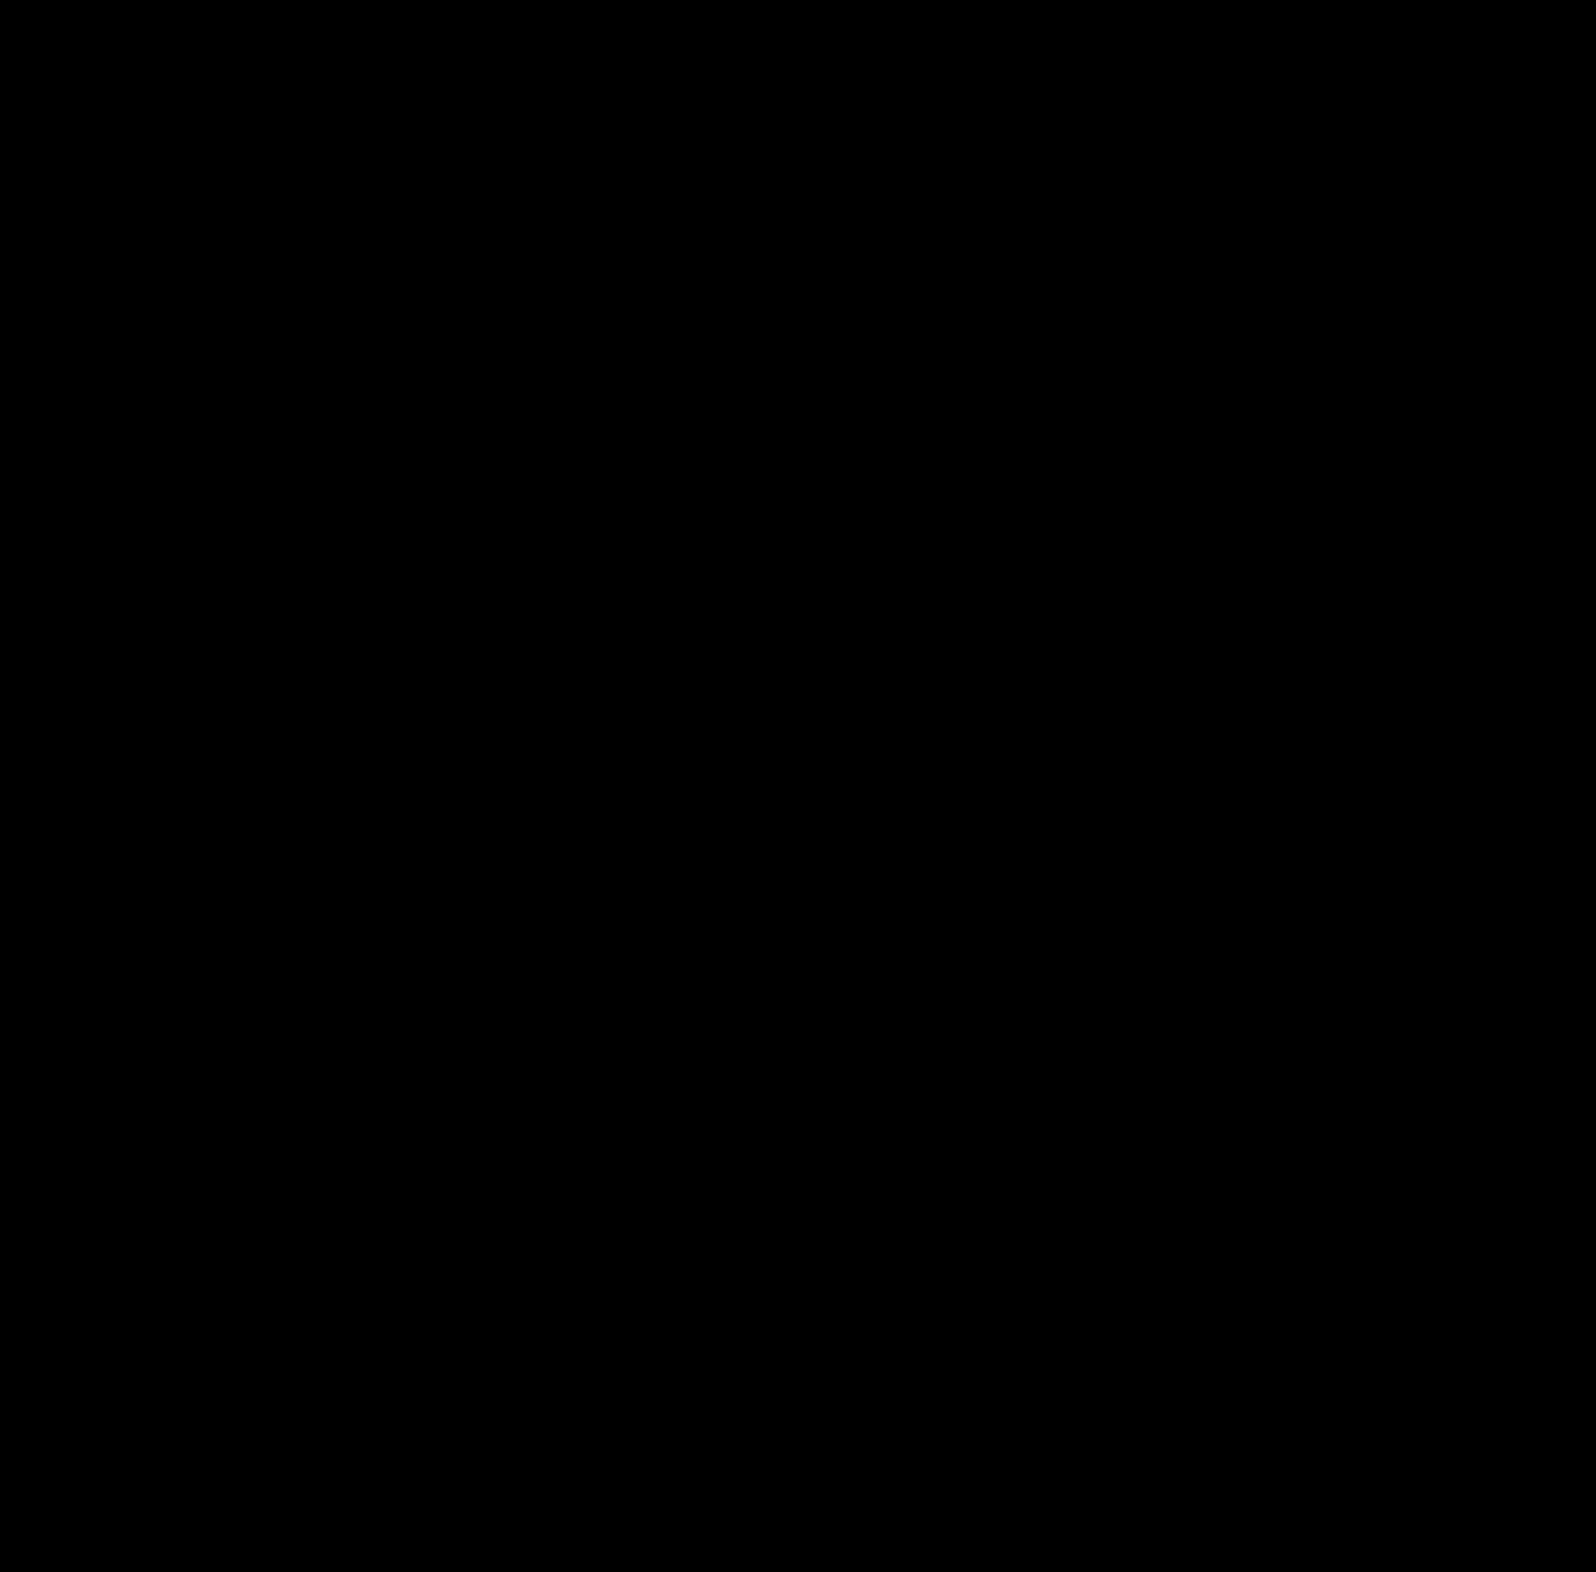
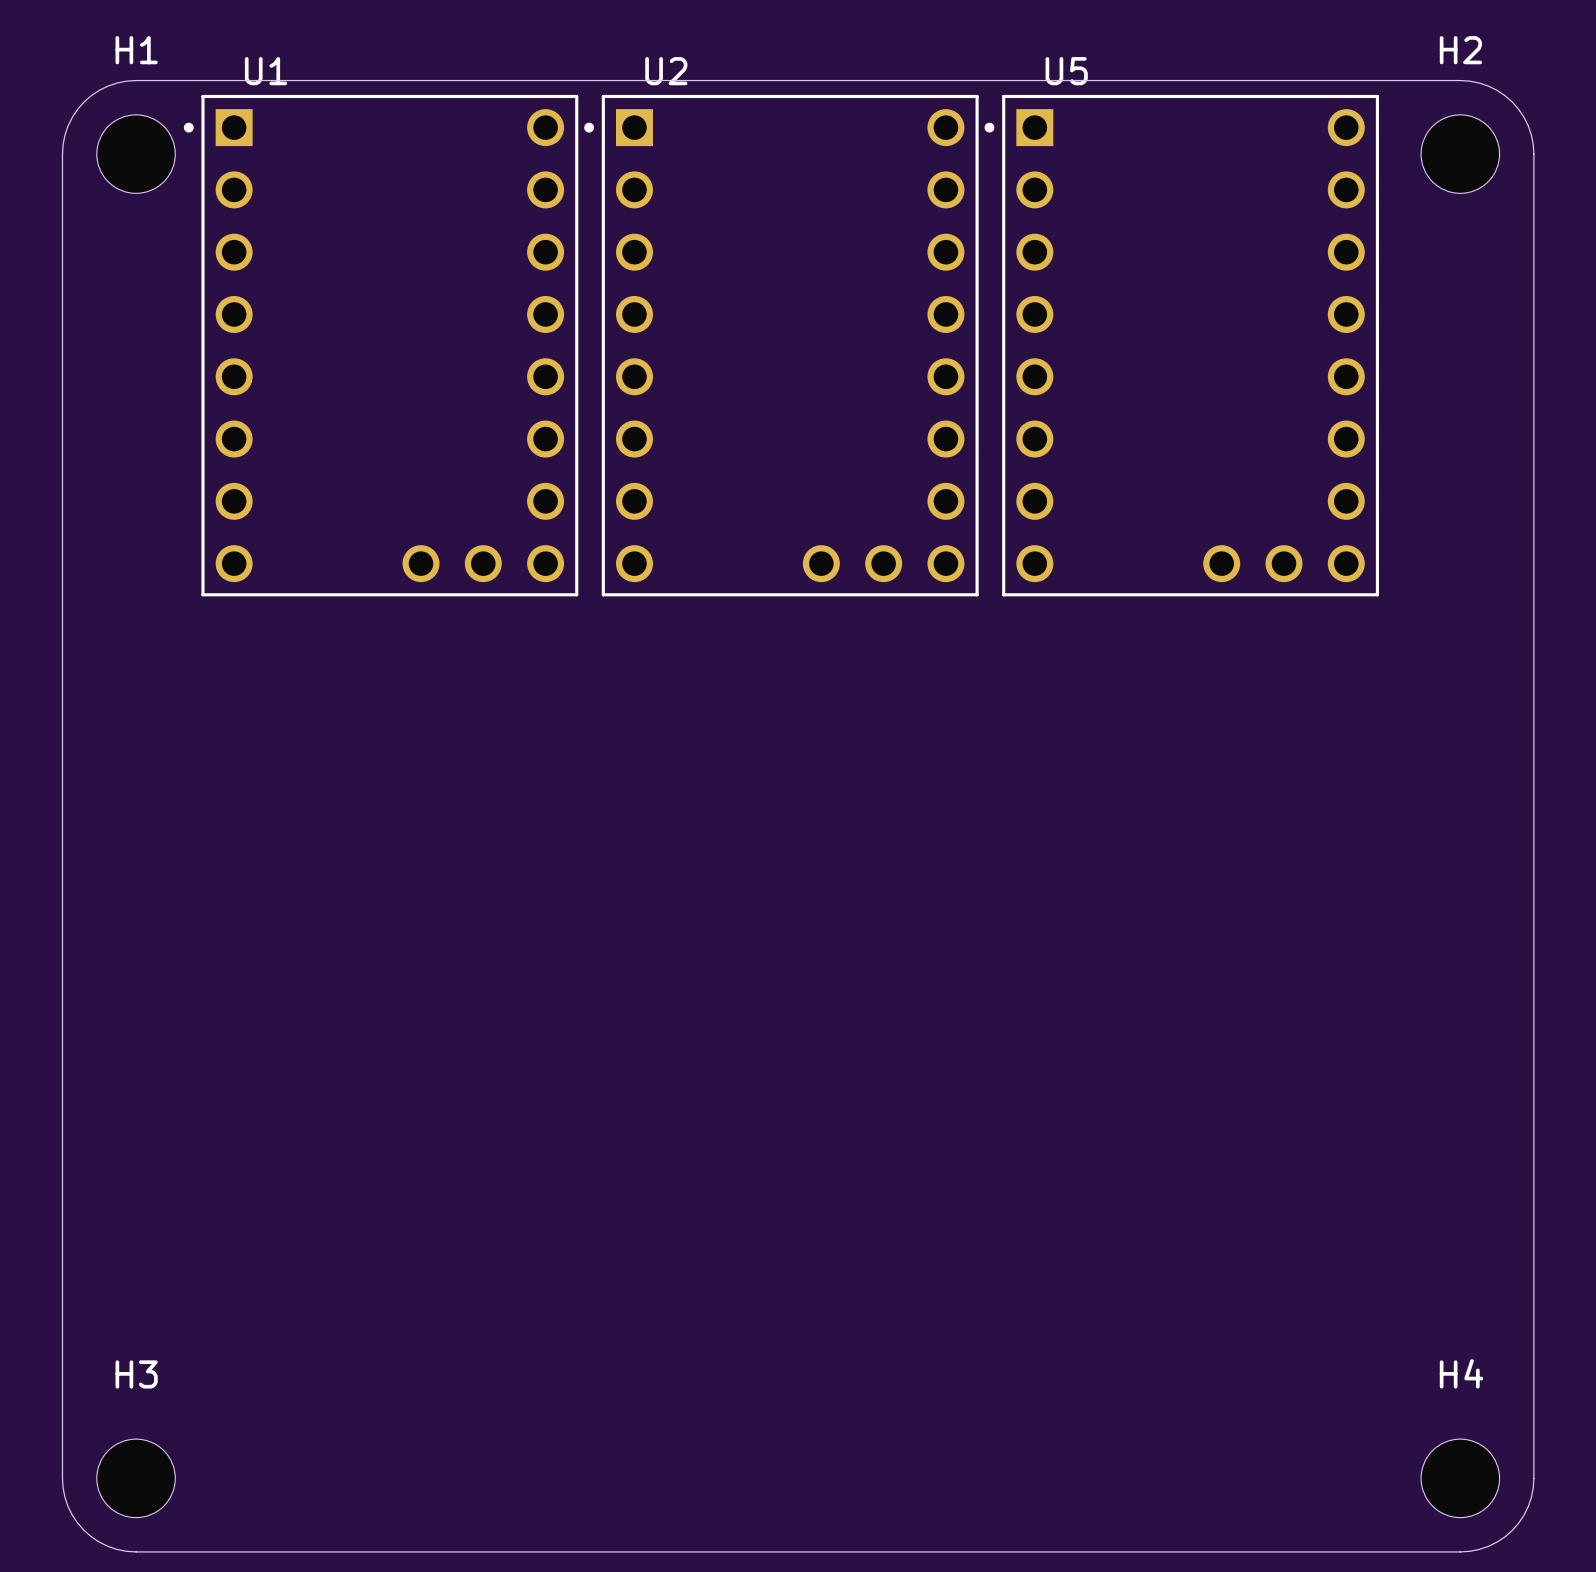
board edge: none -> (136, 80) (1460, 80) (1488, 86) (1512, 102) (1528, 125) (1533, 154) (1533, 1478) (1528, 1506) (1512, 1530) (1488, 1546) (1460, 1551) (136, 1551) (107, 1546) (84, 1530) (68, 1506) (62, 1478) (62, 154) (68, 125) (84, 102) (107, 86) (136, 80)
H1: none -> (136, 154)
H2: none -> (1460, 154)
U1: none -> (381, 345)
U2: none -> (781, 345)
U5: none -> (1181, 345)
H3: none -> (136, 1478)
H4: none -> (1460, 1478)

